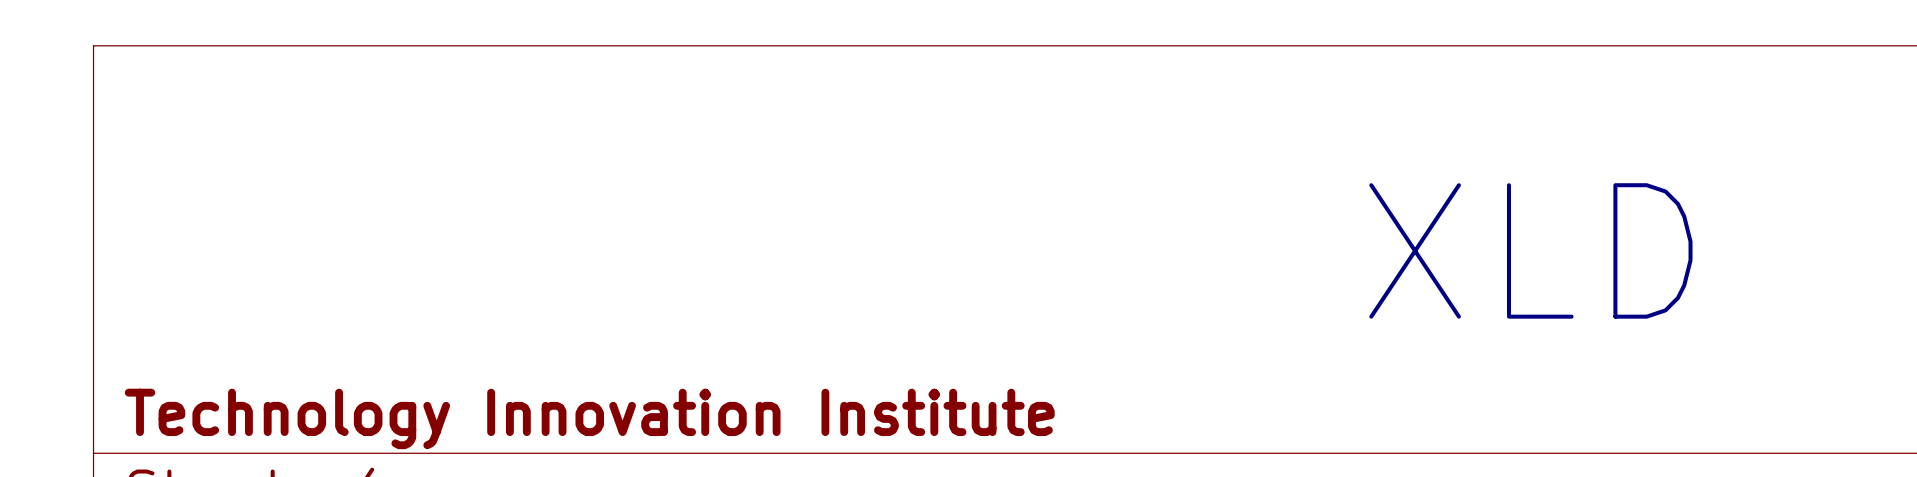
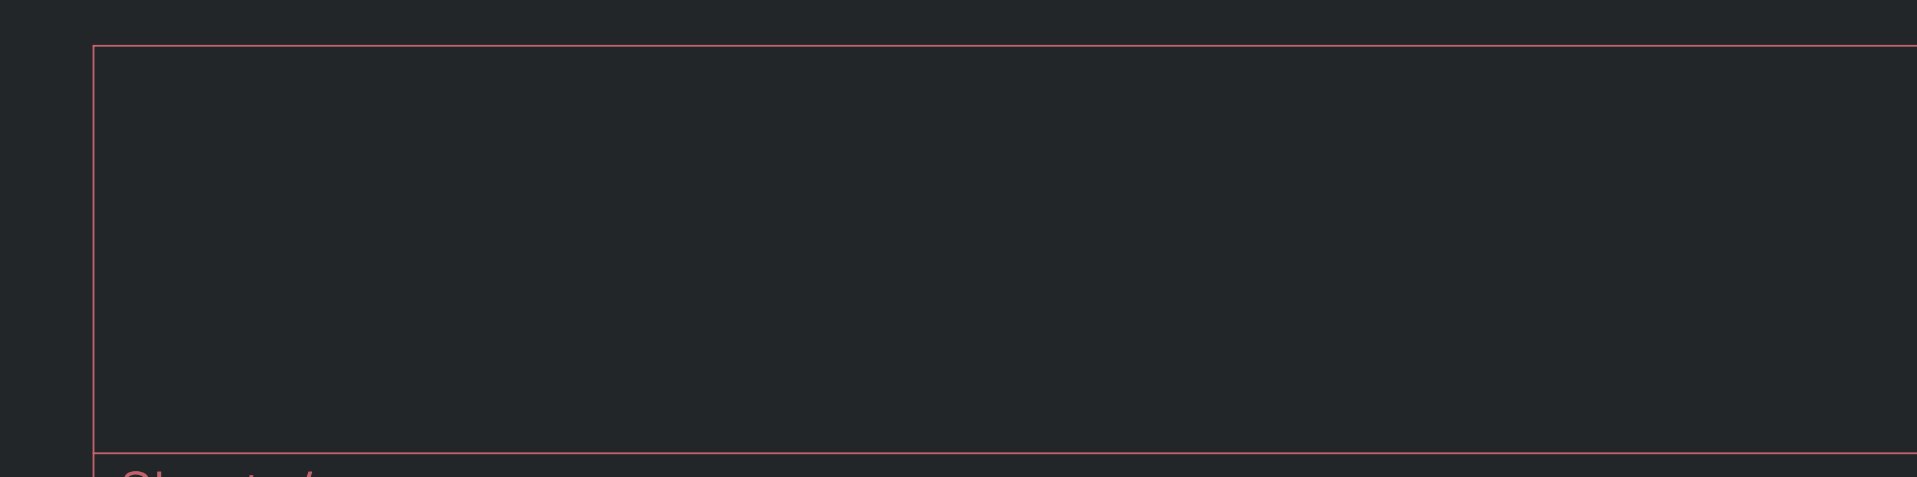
text: XLD (1530, 250) -> none
title block: Technology Innovation Institute (589, 418) -> none

